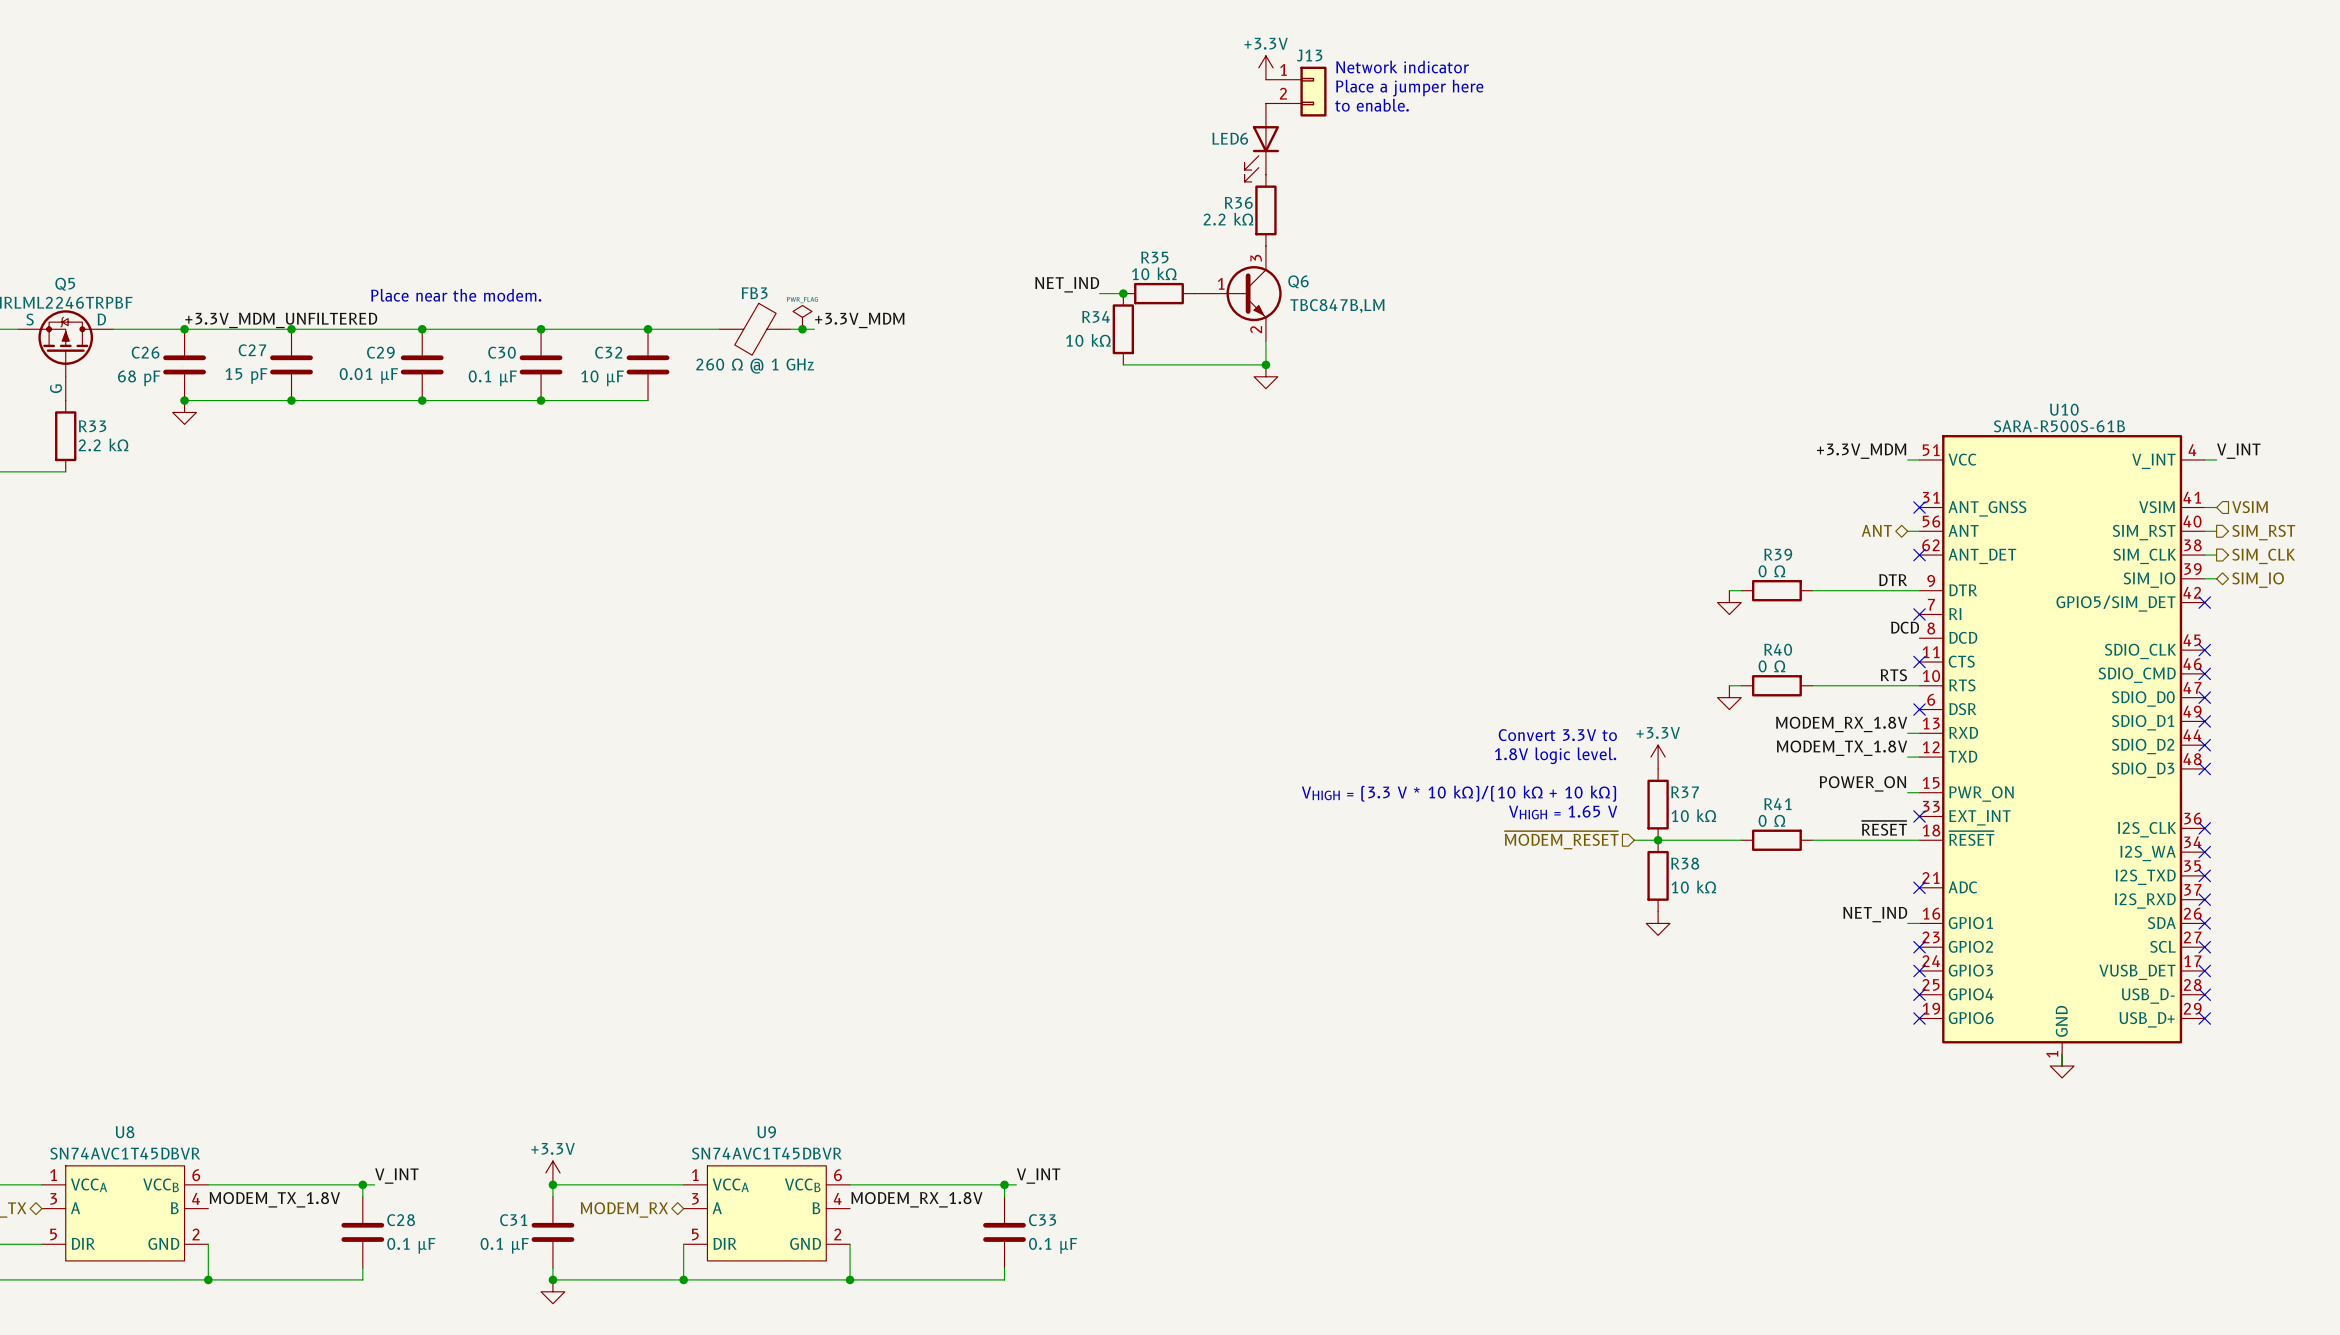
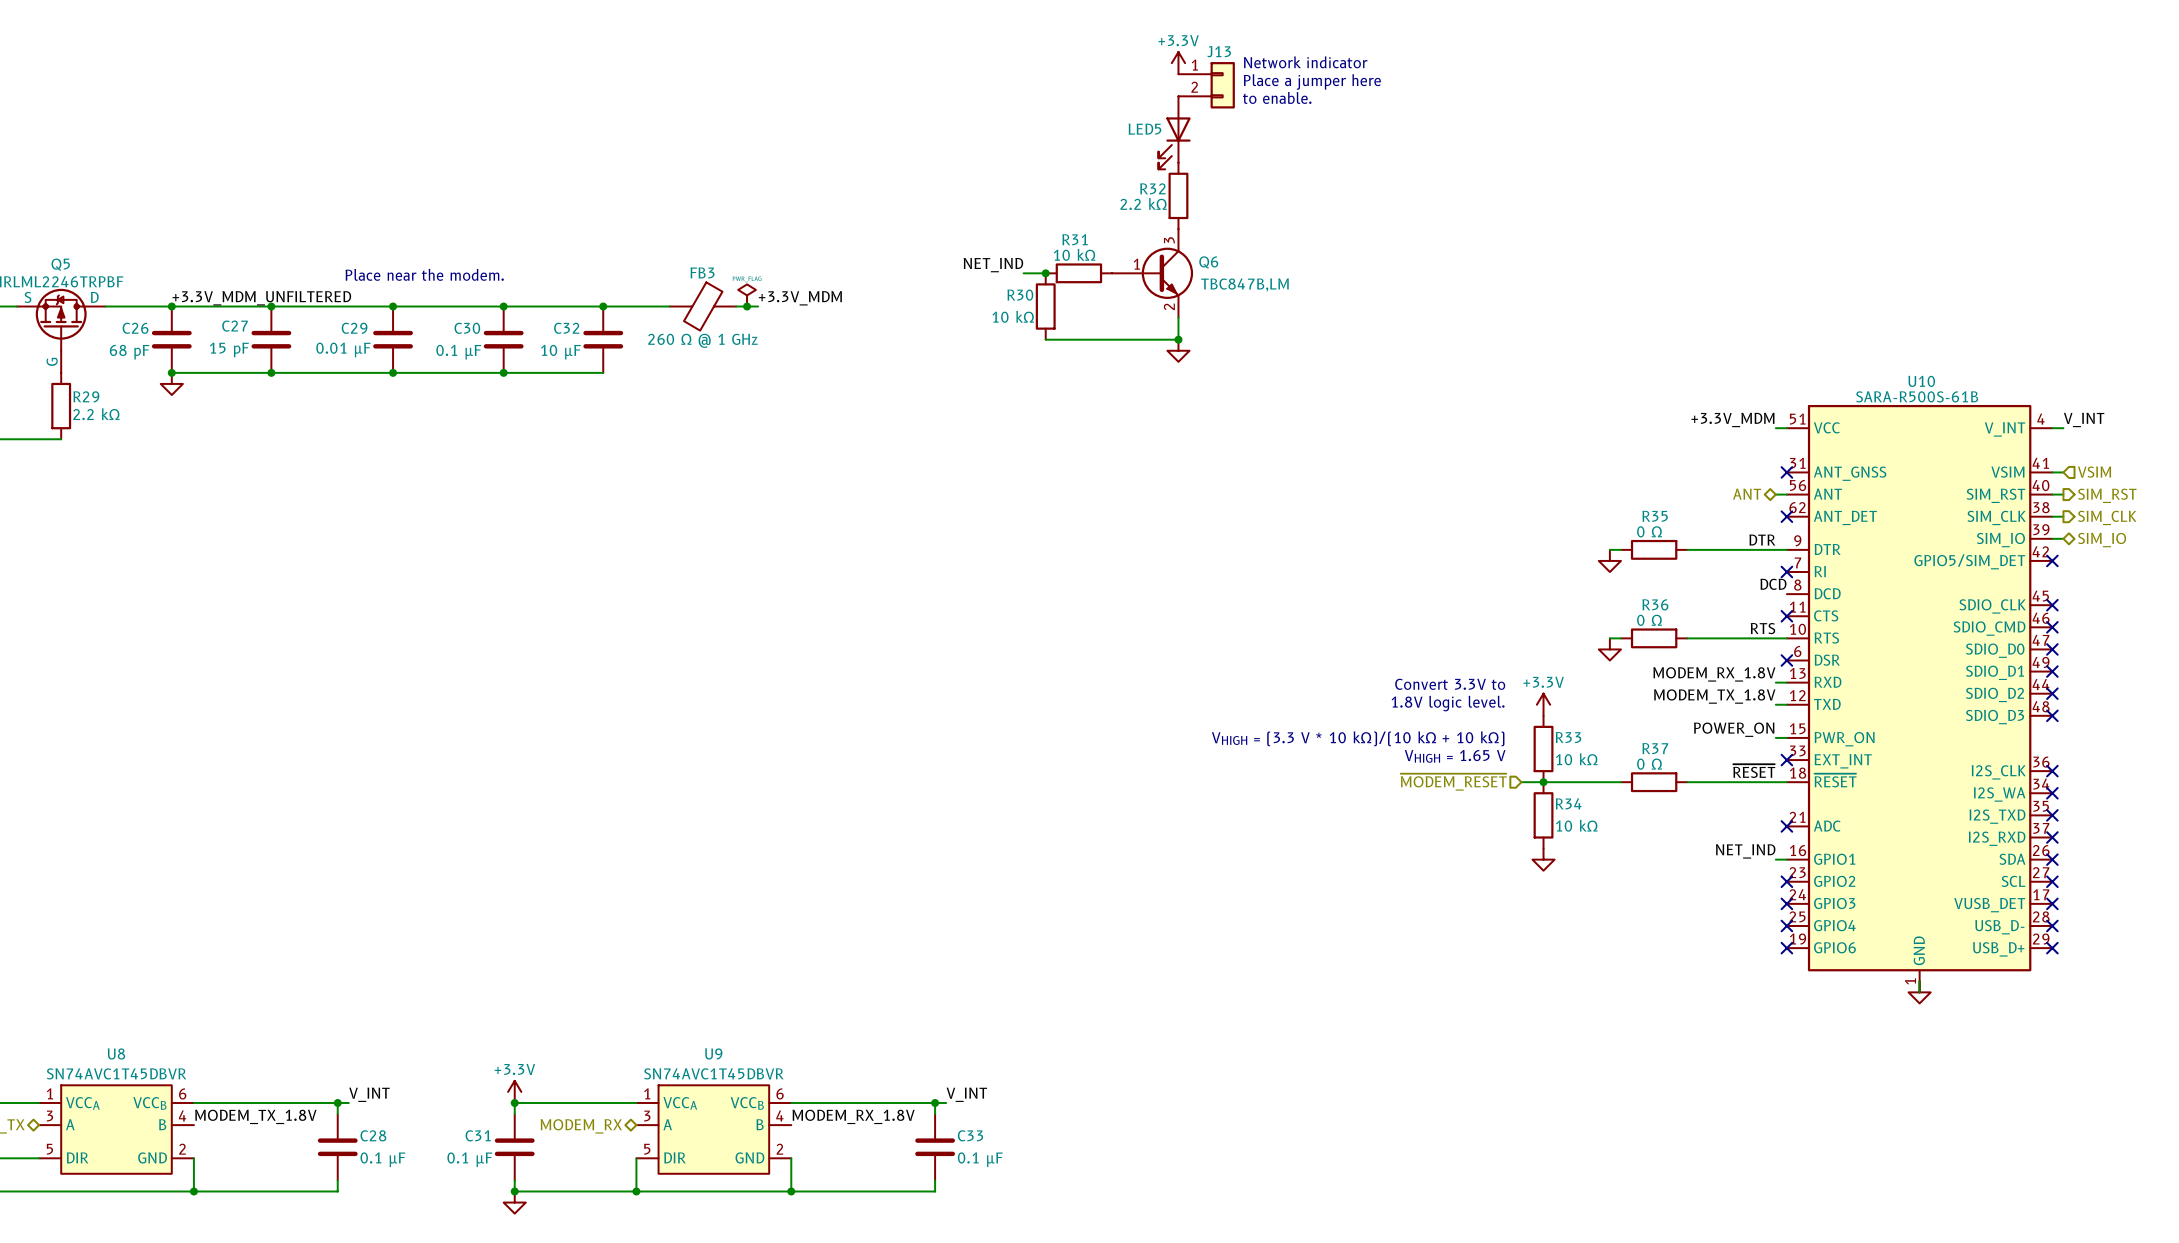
LED6 name: LED6 (1230, 138) -> LED5 (1144, 129)
R36 name: R36 (1238, 202) -> R32 (1152, 188)
R35 name: R35 (1154, 257) -> R31 (1075, 239)
R34 name: R34 (1096, 316) -> R30 (1020, 295)
R33 name: R33 (92, 426) -> R29 (86, 396)
R39 name: R39 (1778, 554) -> R35 (1655, 516)
R40 name: R40 (1778, 649) -> R36 (1655, 604)
R37 name: R37 (1685, 792) -> R33 (1568, 737)
R41 name: R41 (1777, 804) -> R37 (1655, 748)
R38 name: R38 (1685, 863) -> R34 (1568, 803)

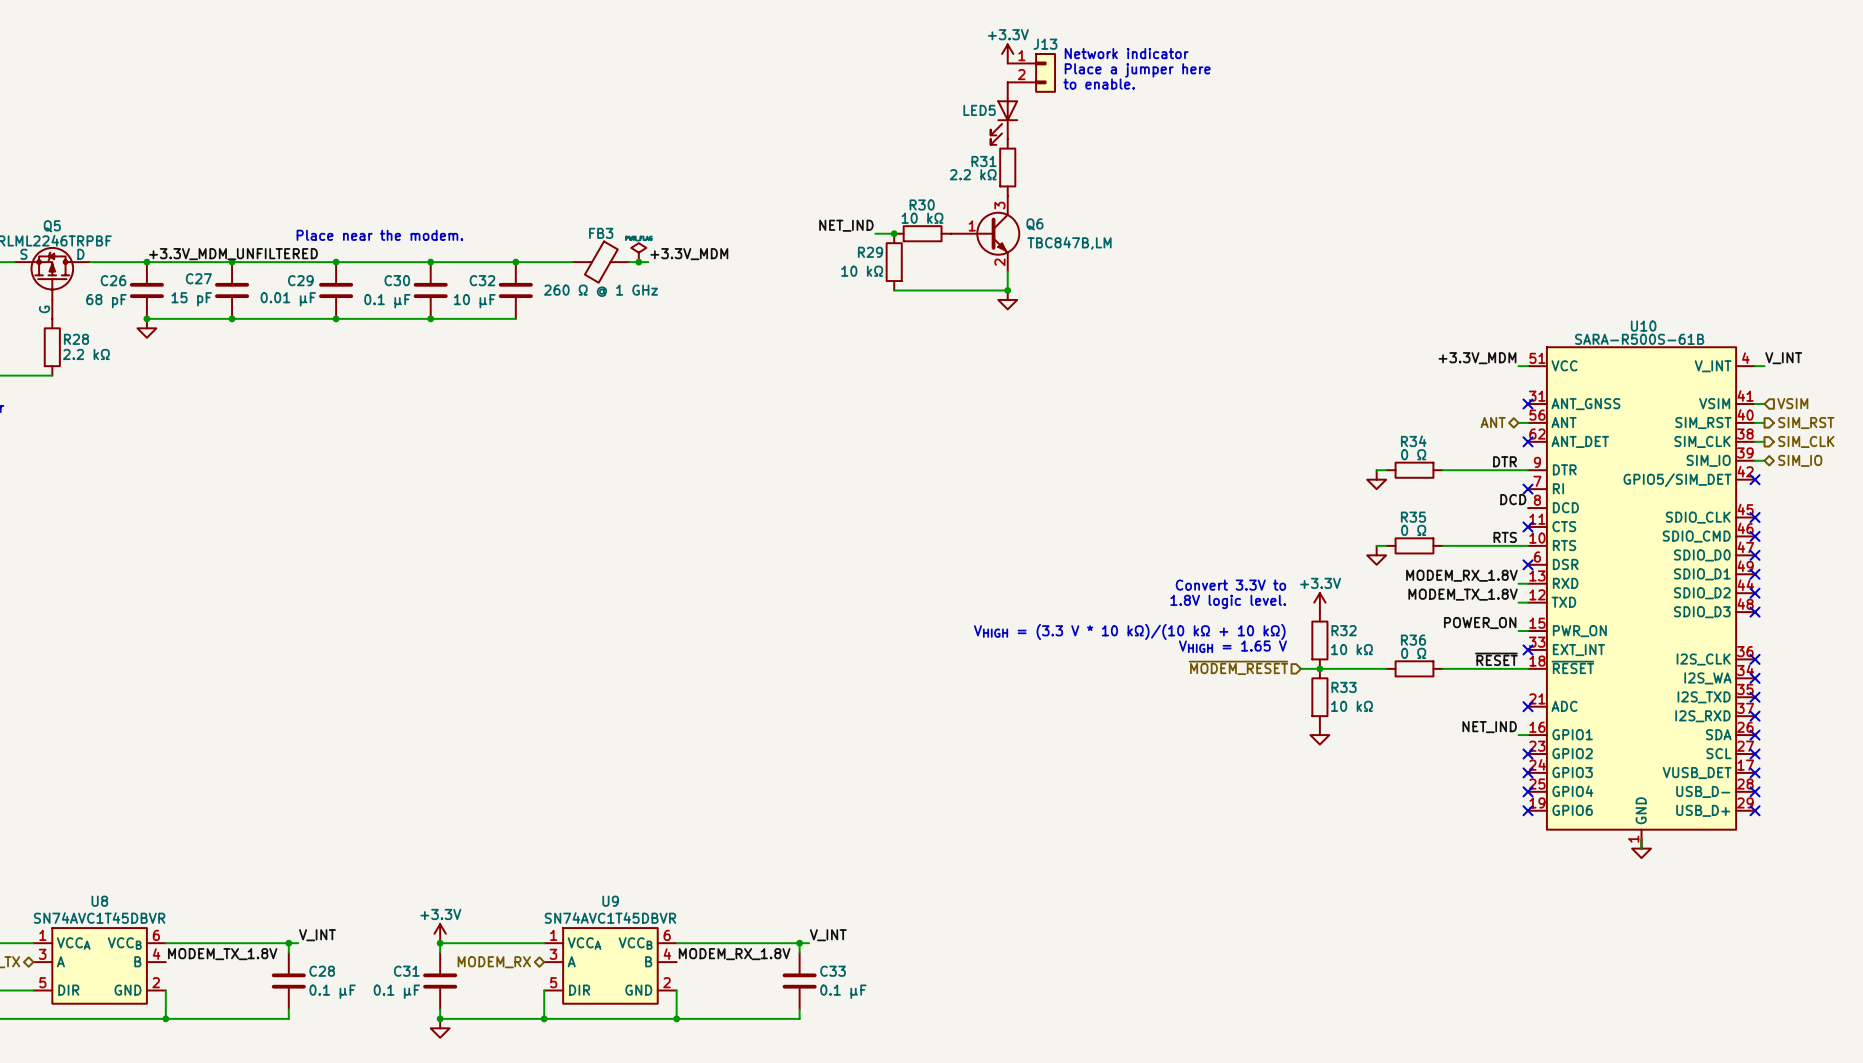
R32 name: R32 (1152, 188) -> R31 (984, 161)
R31 name: R31 (1075, 239) -> R30 (922, 204)
R30 name: R30 (1020, 295) -> R29 (870, 252)
R29 name: R29 (86, 396) -> R28 (76, 339)
R35 name: R35 (1655, 516) -> R34 (1413, 441)
R36 name: R36 (1655, 604) -> R35 (1413, 517)
R33 name: R33 (1568, 737) -> R32 (1344, 630)
R37 name: R37 (1655, 748) -> R36 (1413, 640)
R34 name: R34 (1568, 803) -> R33 (1344, 687)

